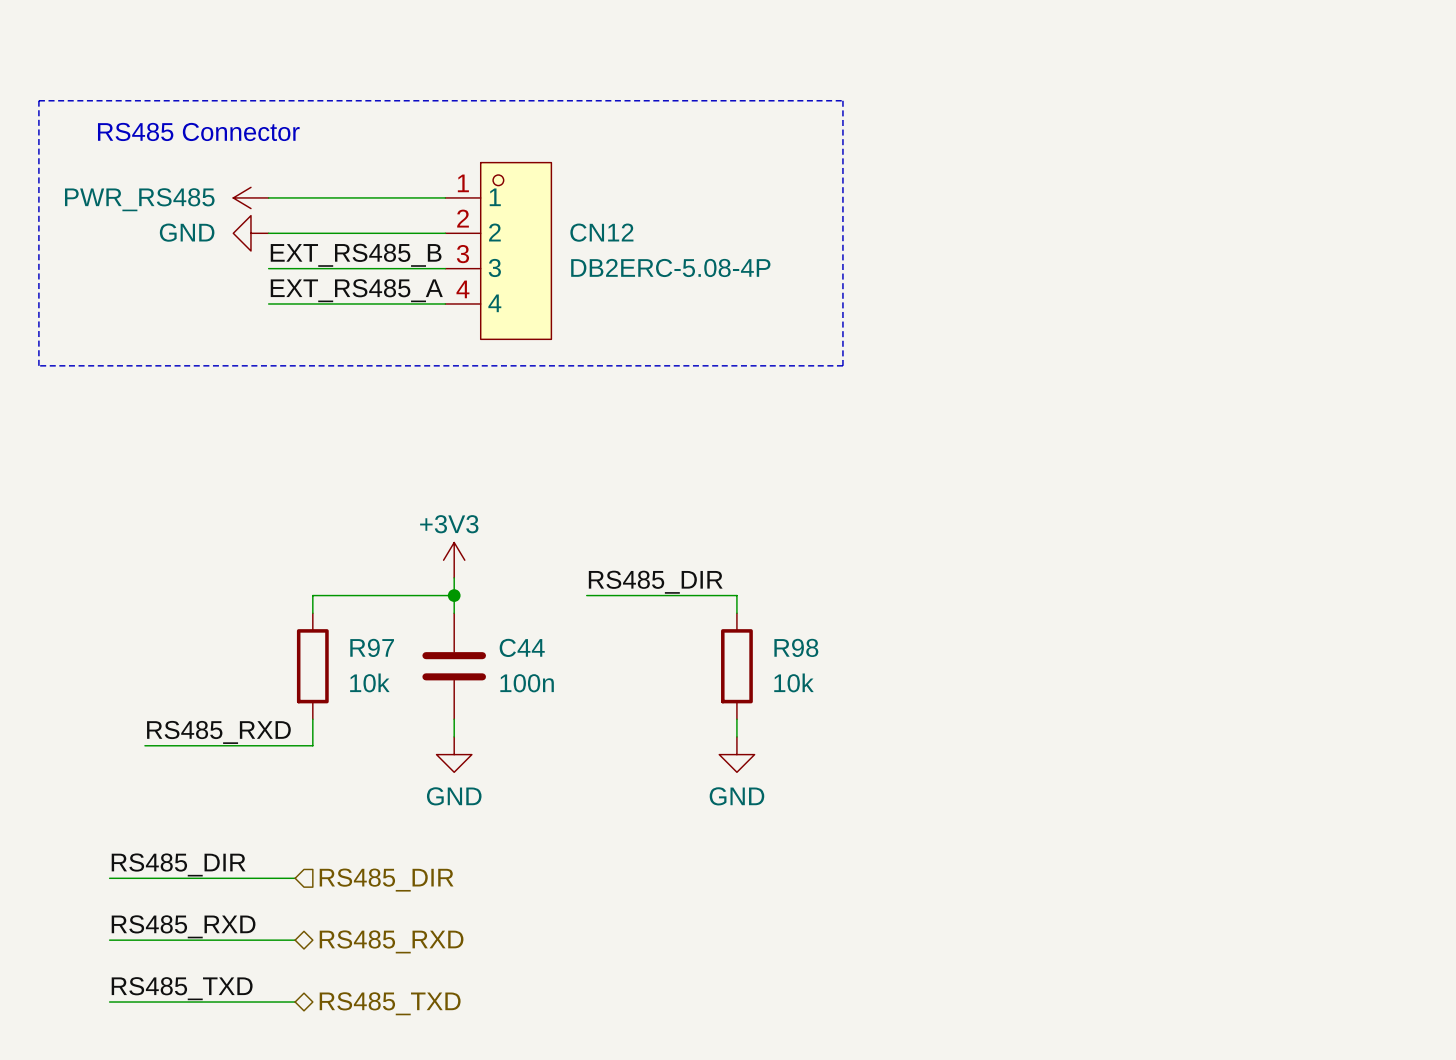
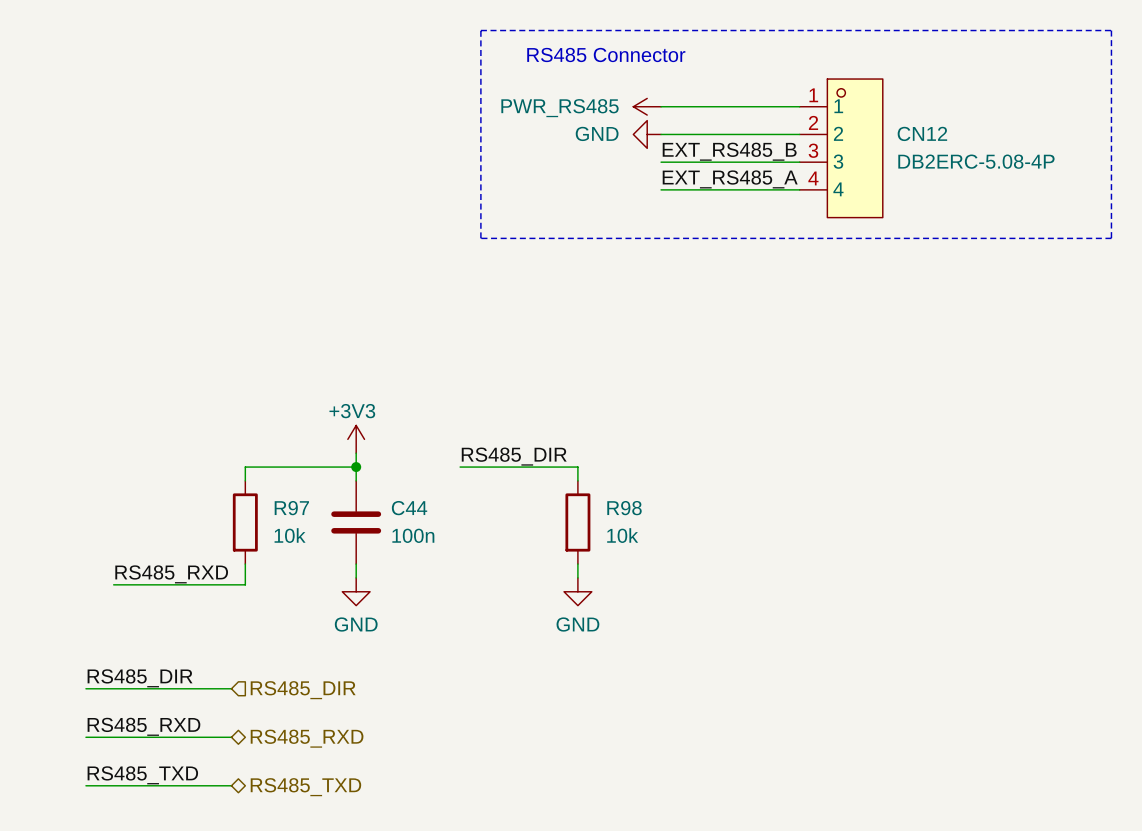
line: none -> (480, 30) (1111, 30) (1111, 238) (480, 238) (480, 30)
text: none -> RS485 Connector (606, 54)
line: (38, 100) (842, 100) (842, 365) (38, 365) (38, 100) -> none
text: RS485 Connector (198, 131) -> none
power symbol: none -> PWR_RS485 (647, 106)
wire: none -> (661, 106) (799, 106)
power symbol: none -> GND (647, 134)
wire: none -> (661, 134) (799, 134)
label: none -> EXT_RS485_B (729, 151)
power symbol: PWR_RS485 (250, 197) -> none
wire: (268, 197) (445, 197) -> none
wire: none -> (661, 162) (799, 162)
label: none -> EXT_RS485_A (730, 179)
power symbol: GND (250, 233) -> none
wire: (268, 233) (445, 233) -> none
wire: none -> (661, 189) (799, 189)
CN12 position: (498, 250) -> (841, 148)
label: EXT_RS485_B (356, 255) -> none
wire: (268, 268) (445, 268) -> none
label: EXT_RS485_A (356, 290) -> none
wire: (268, 303) (445, 303) -> none

